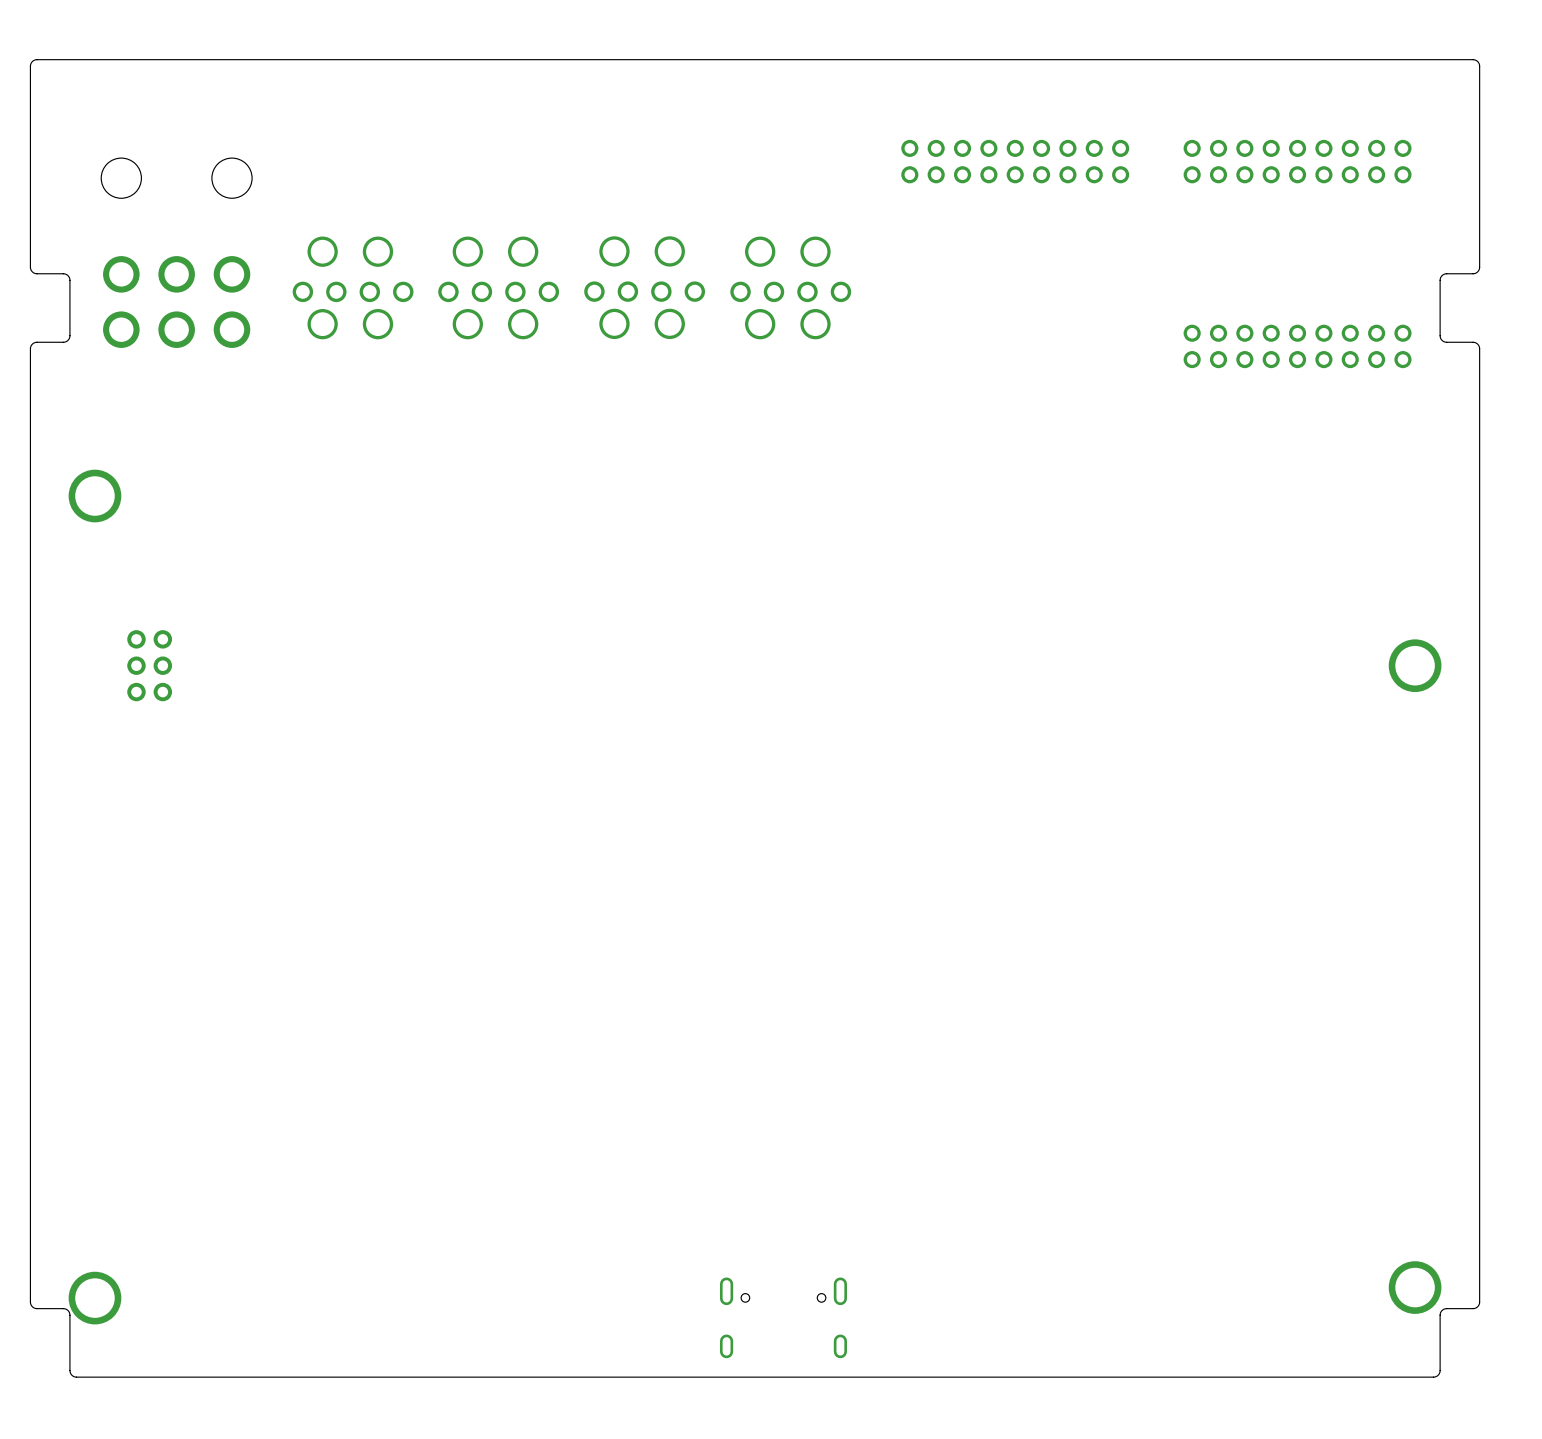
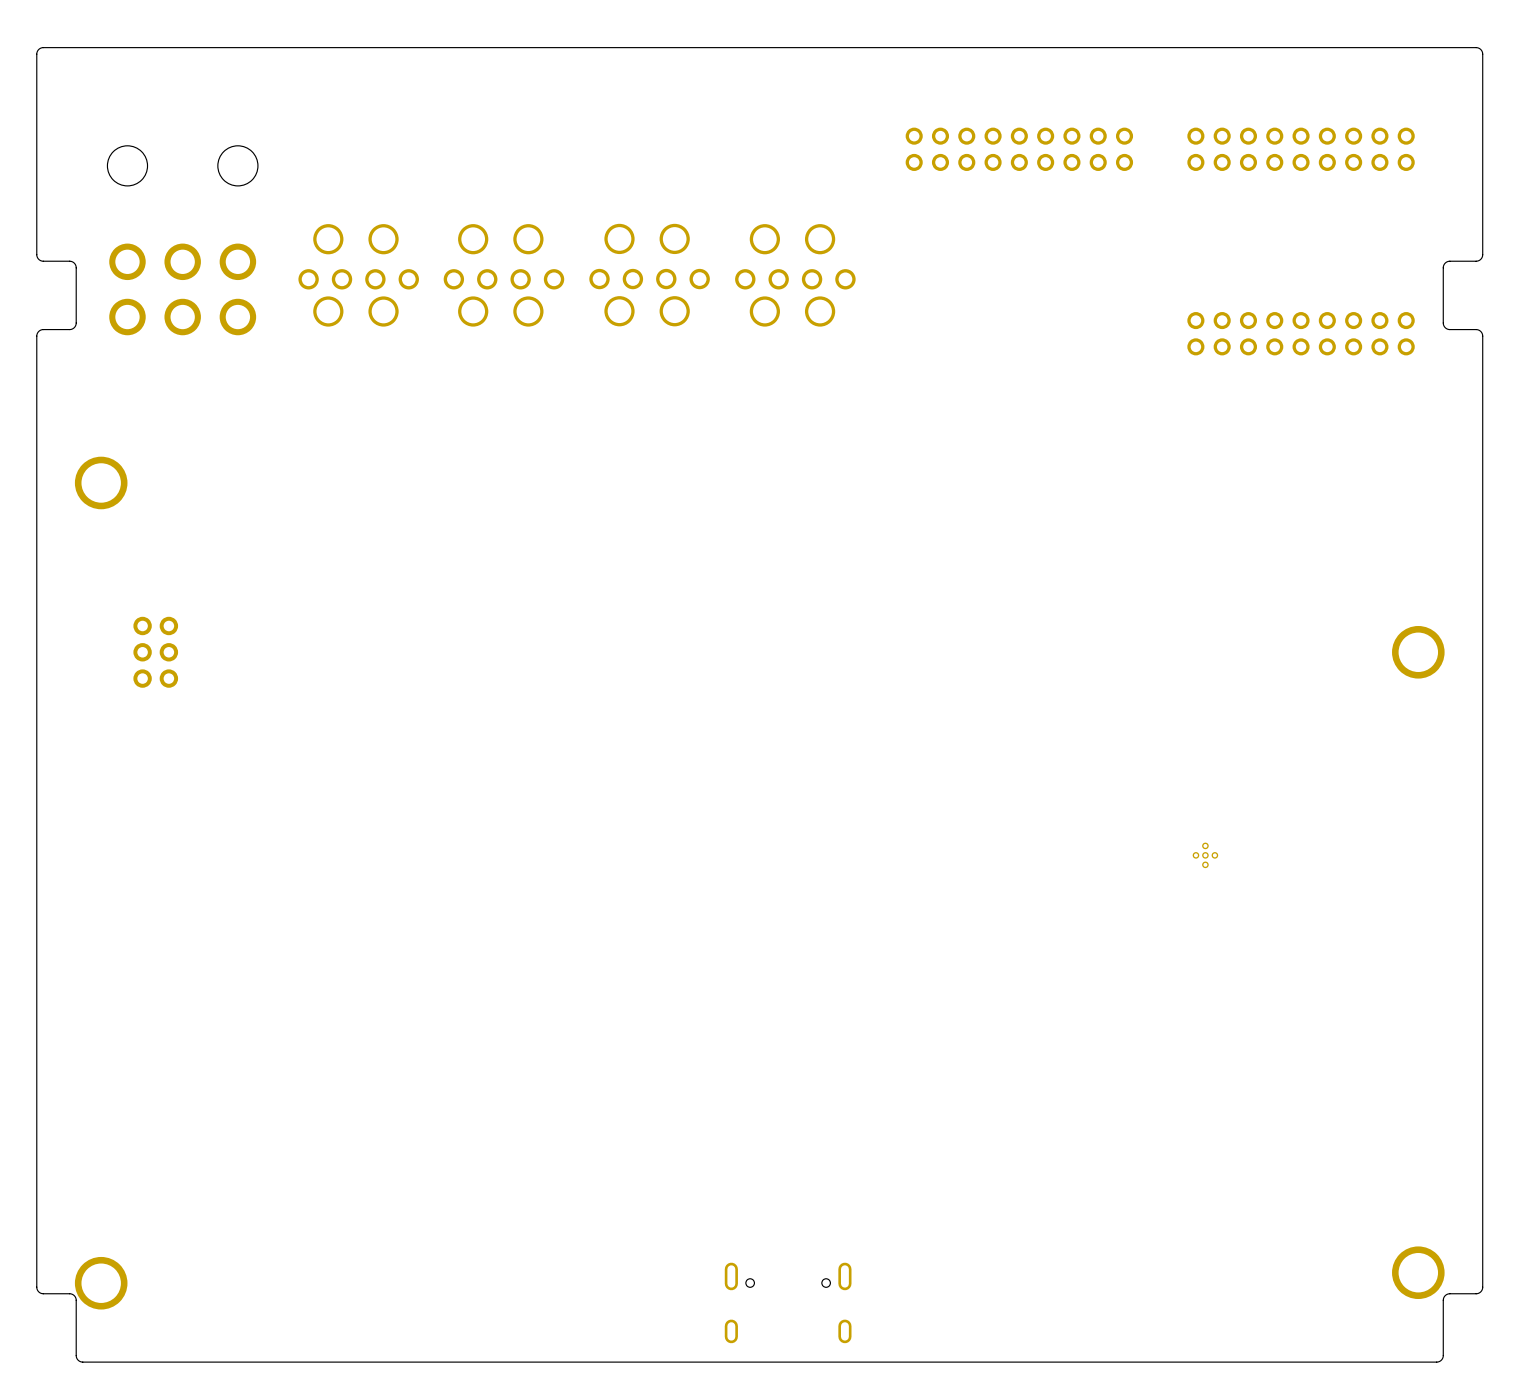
part: none -> (1205, 855)

